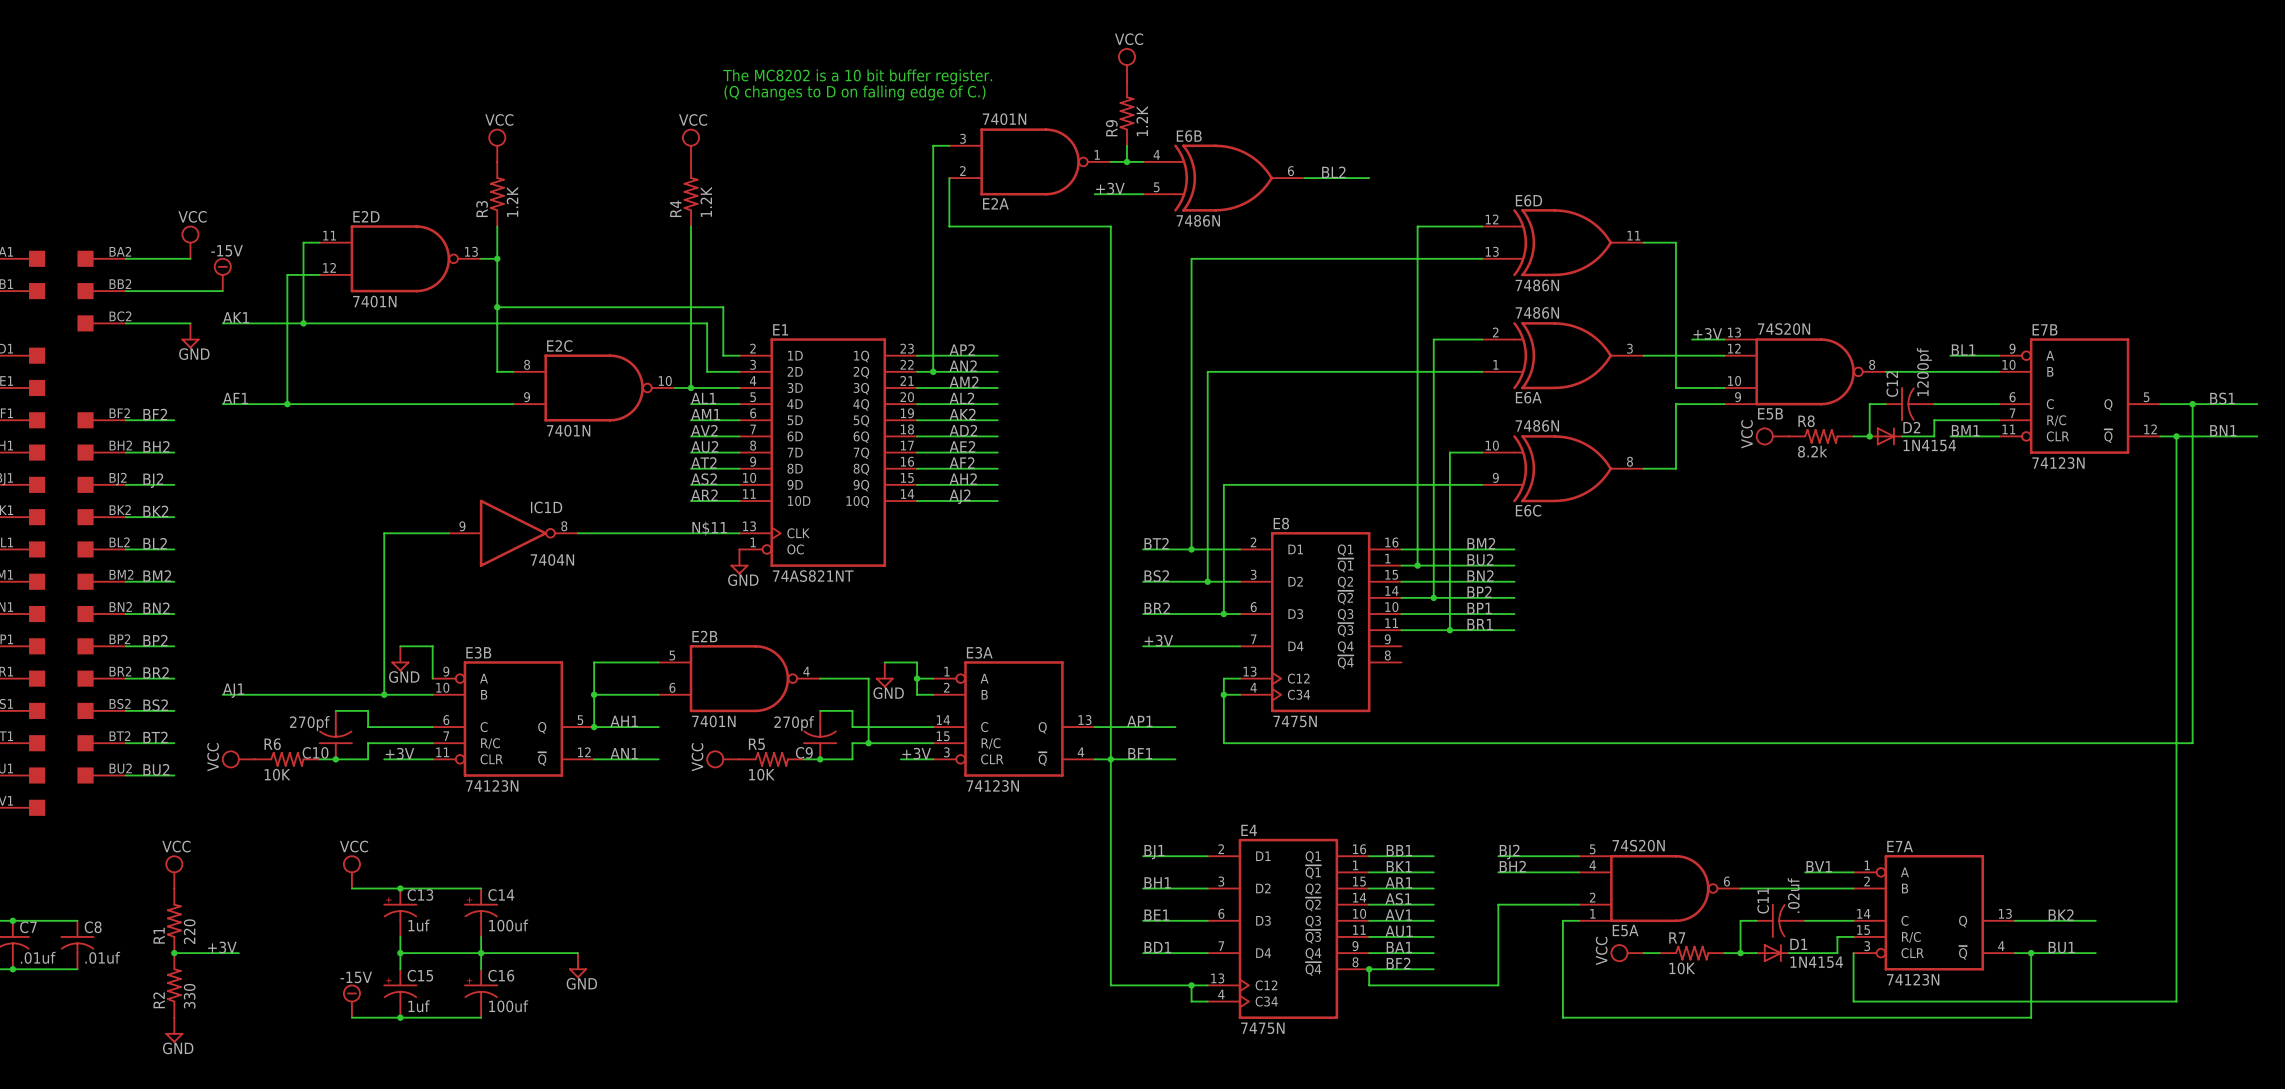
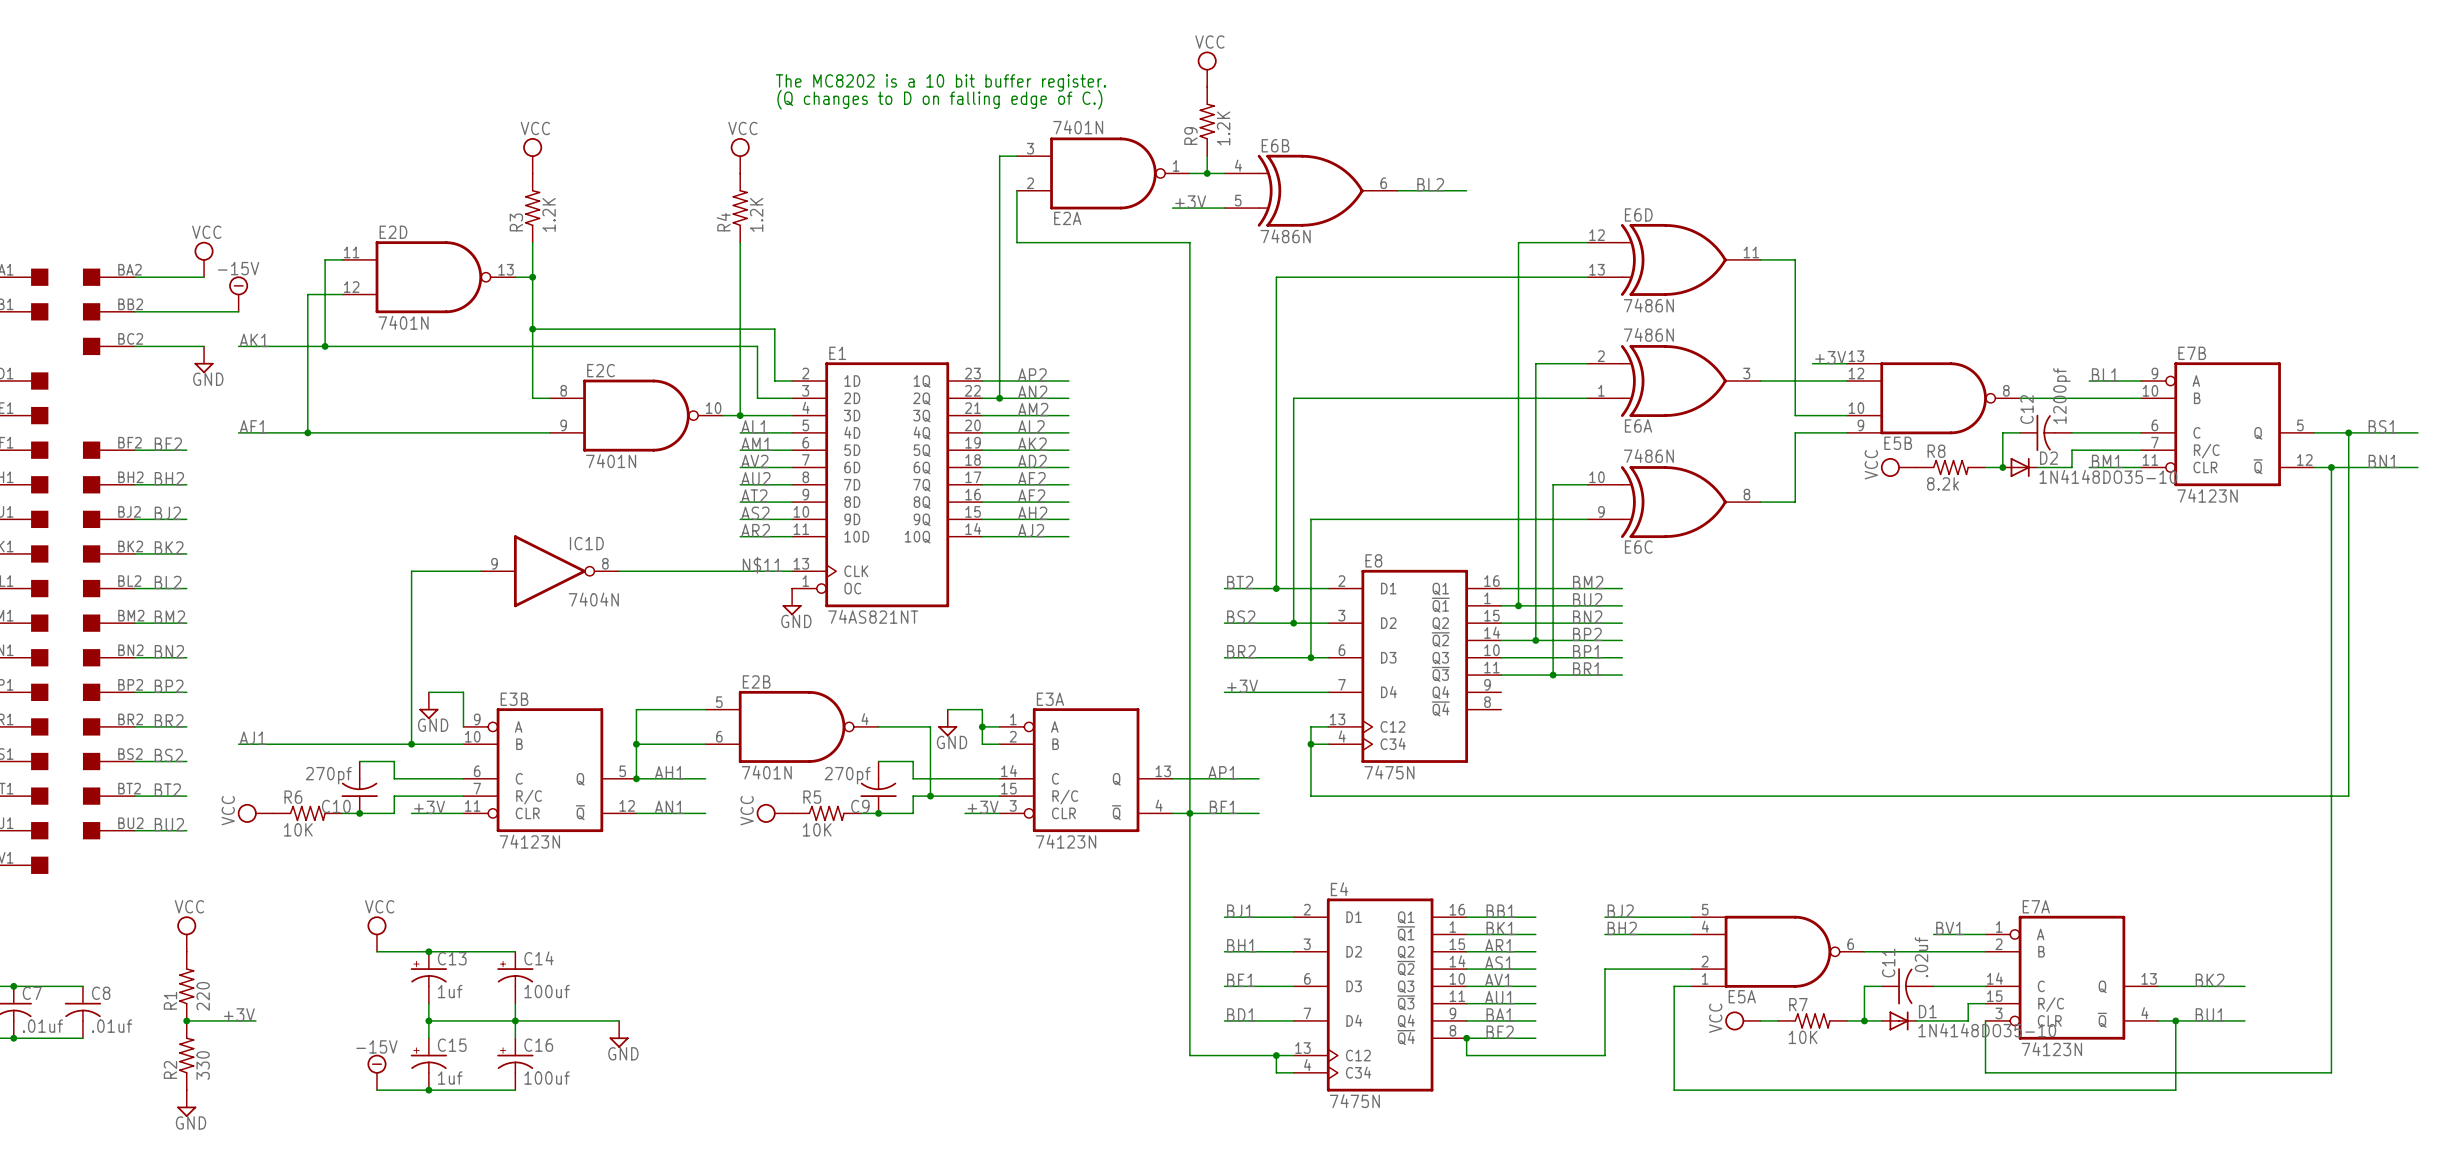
E5B value: 74S20N (1783, 329) -> none
D2 value: 1N4154 (1929, 445) -> 1N4148DO35-10 (2108, 476)
E5A value: 74S20N (1638, 845) -> none
D1 value: 1N4154 (1816, 962) -> 1N4148DO35-10 (1987, 1030)

